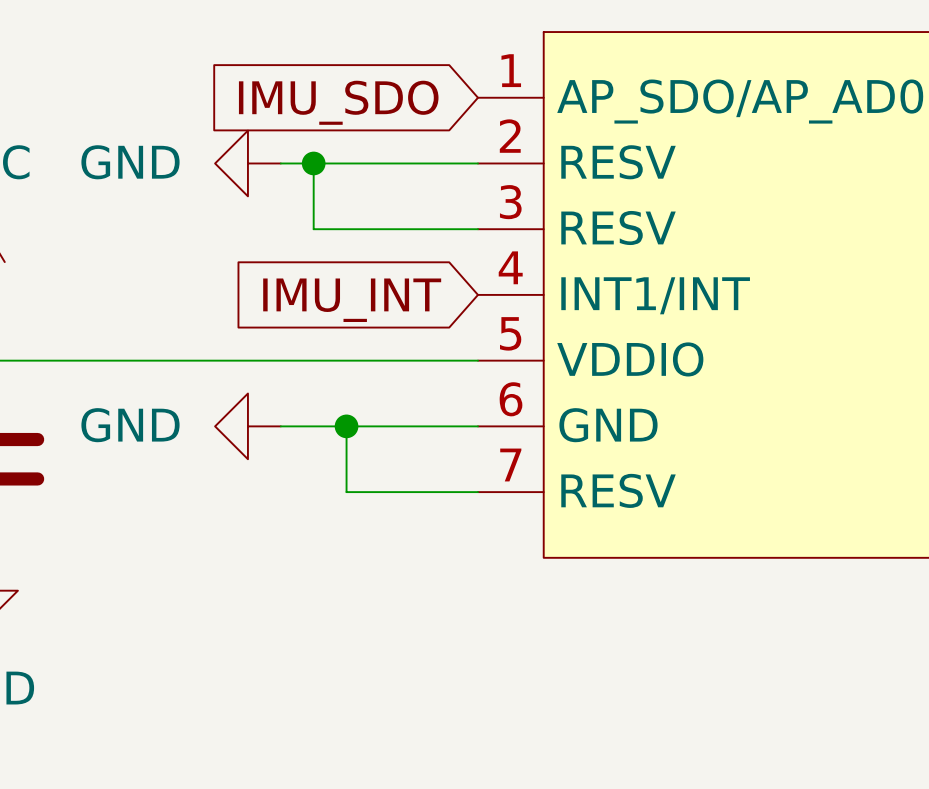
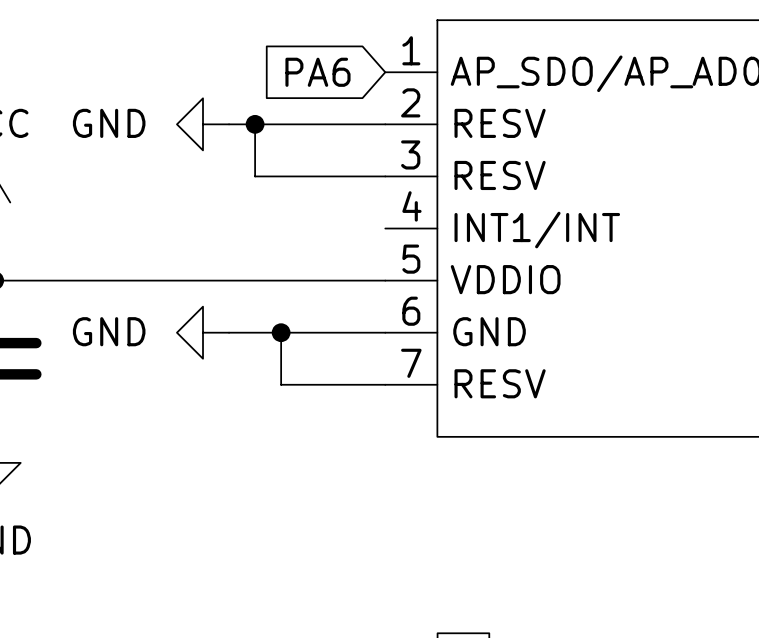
global label: IMU_SDO (338, 102) -> PA6 (317, 72)
global label: IMU_INT (352, 300) -> none

